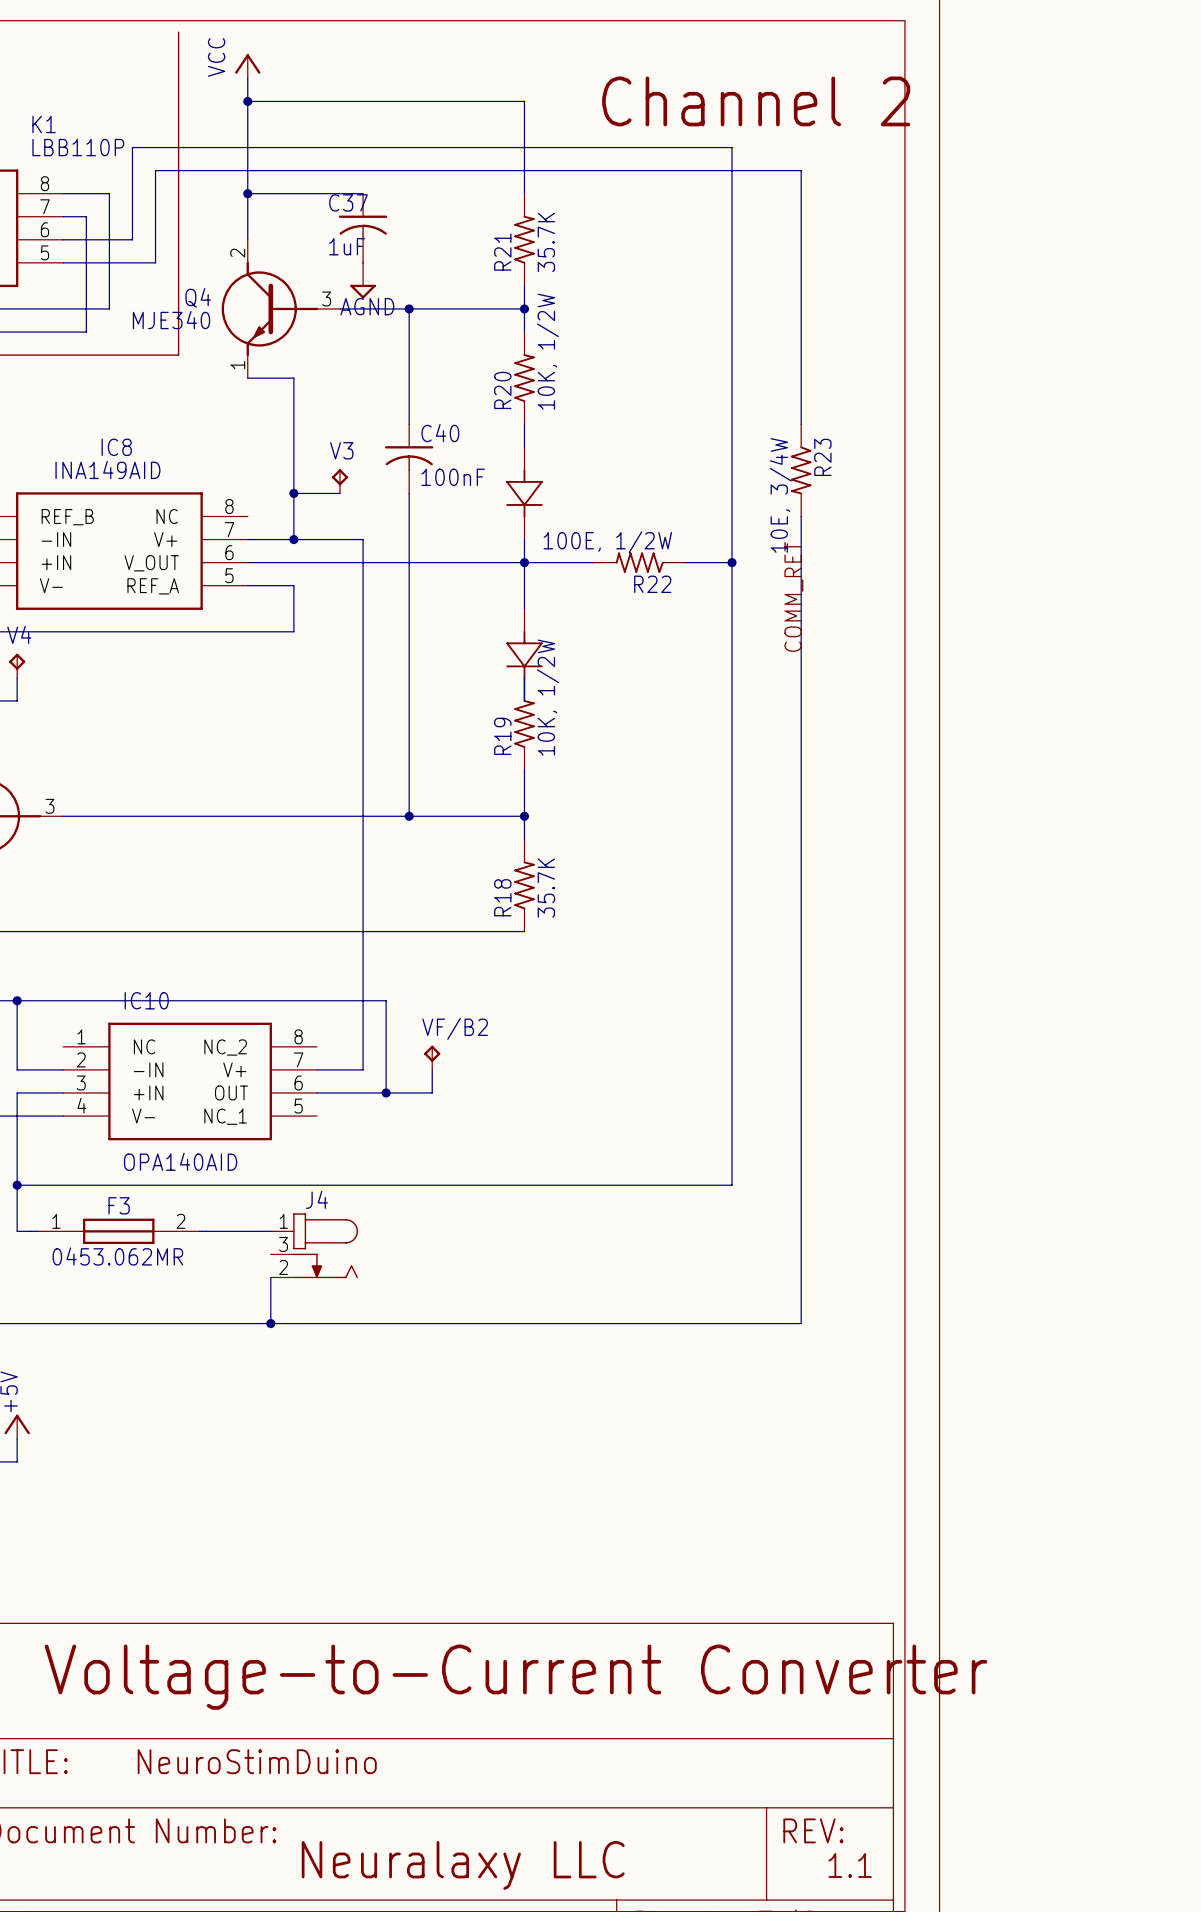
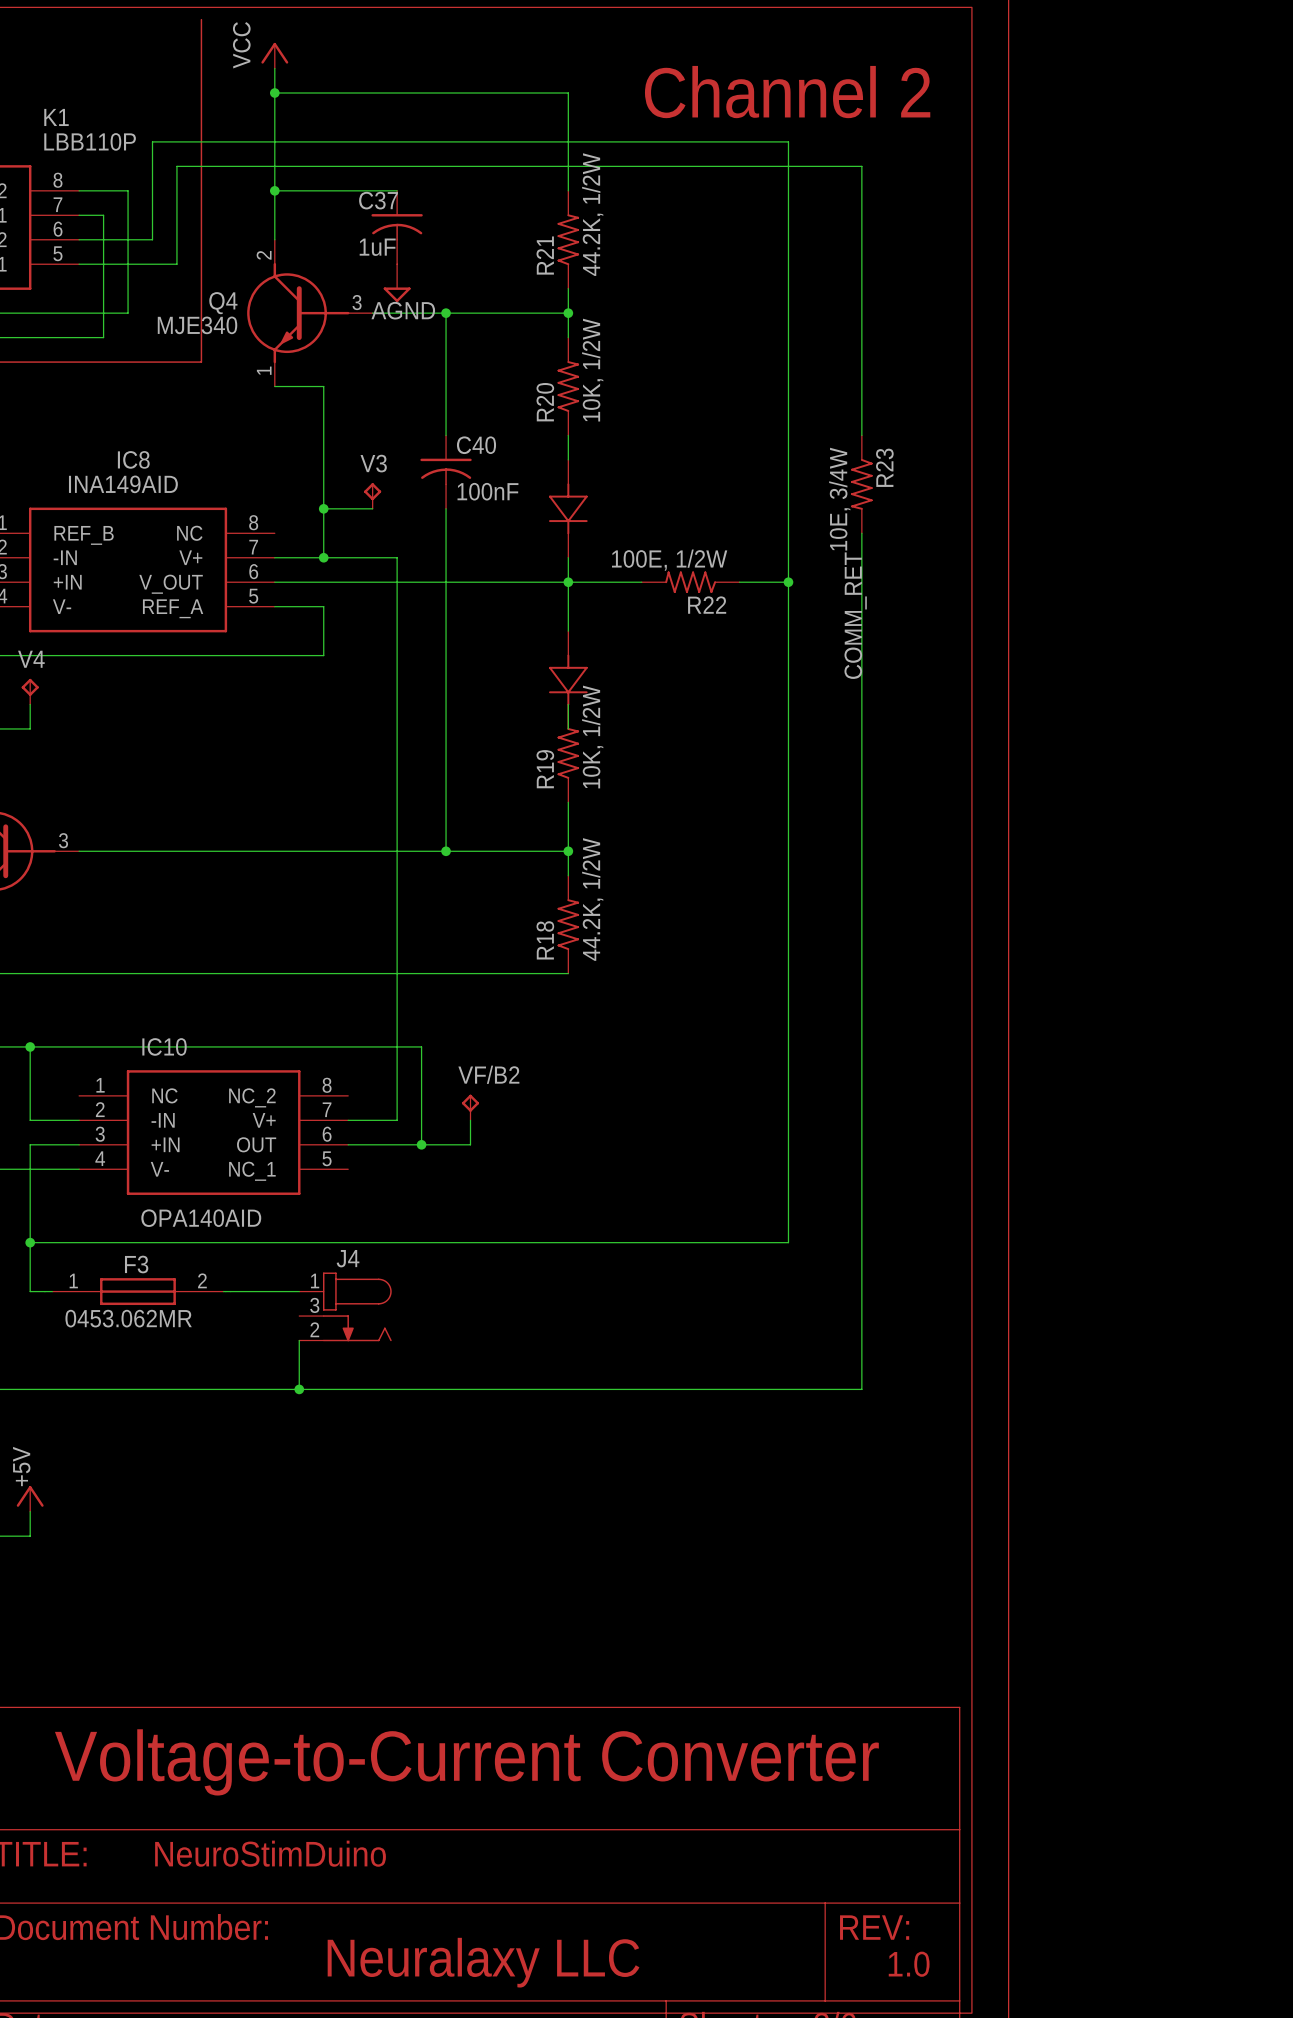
R21 value: 35.7K (546, 242) -> 44.2K, 1/2W (592, 214)
R18 value: 35.7K (546, 888) -> 44.2K, 1/2W (592, 899)
text: 1.1 (850, 1865) -> 1.0 (909, 1964)

